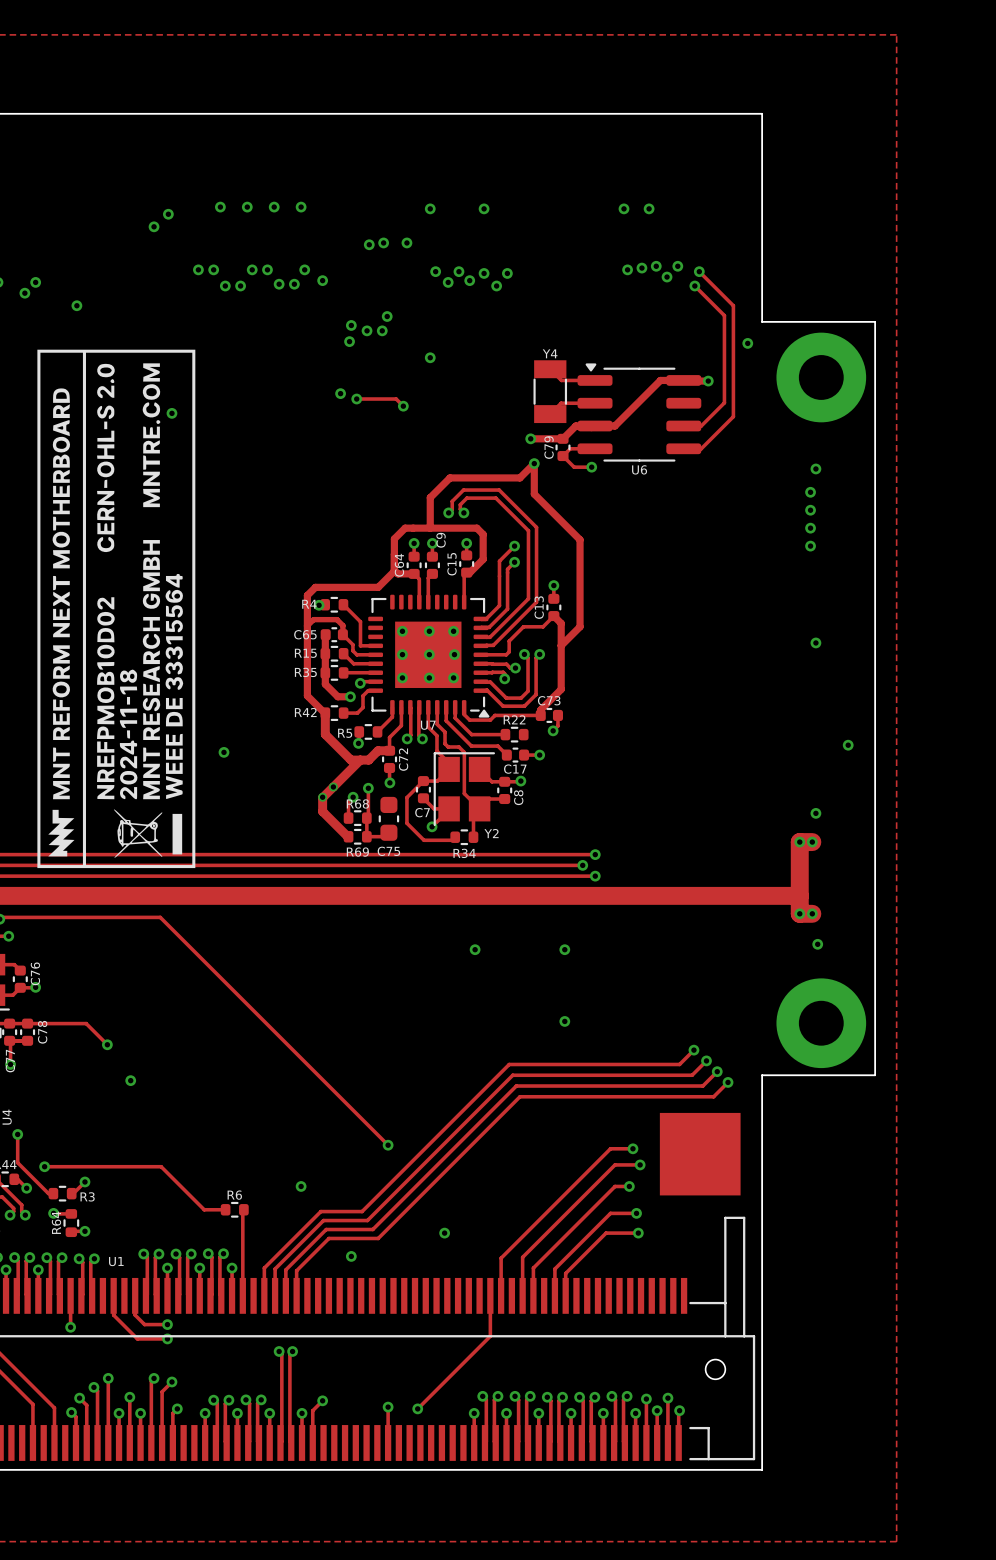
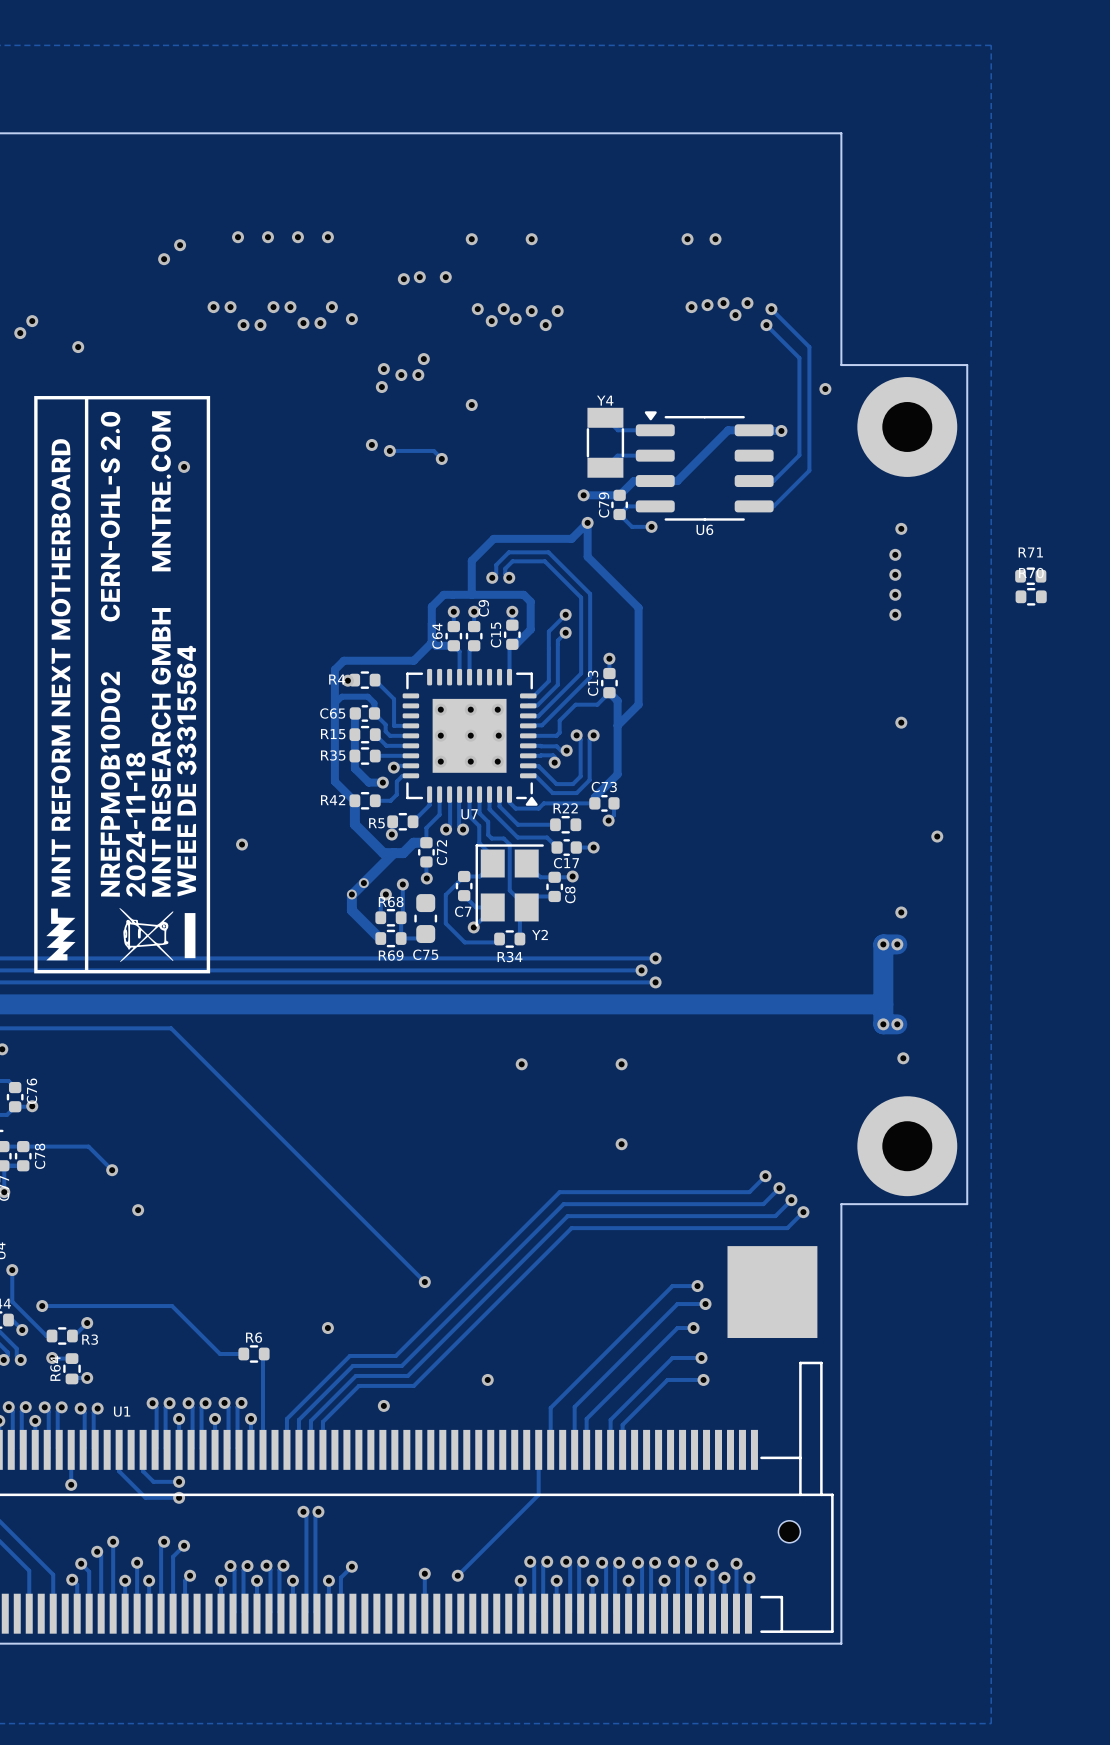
R71: none -> (1030, 576)
part: none -> (1031, 596)

